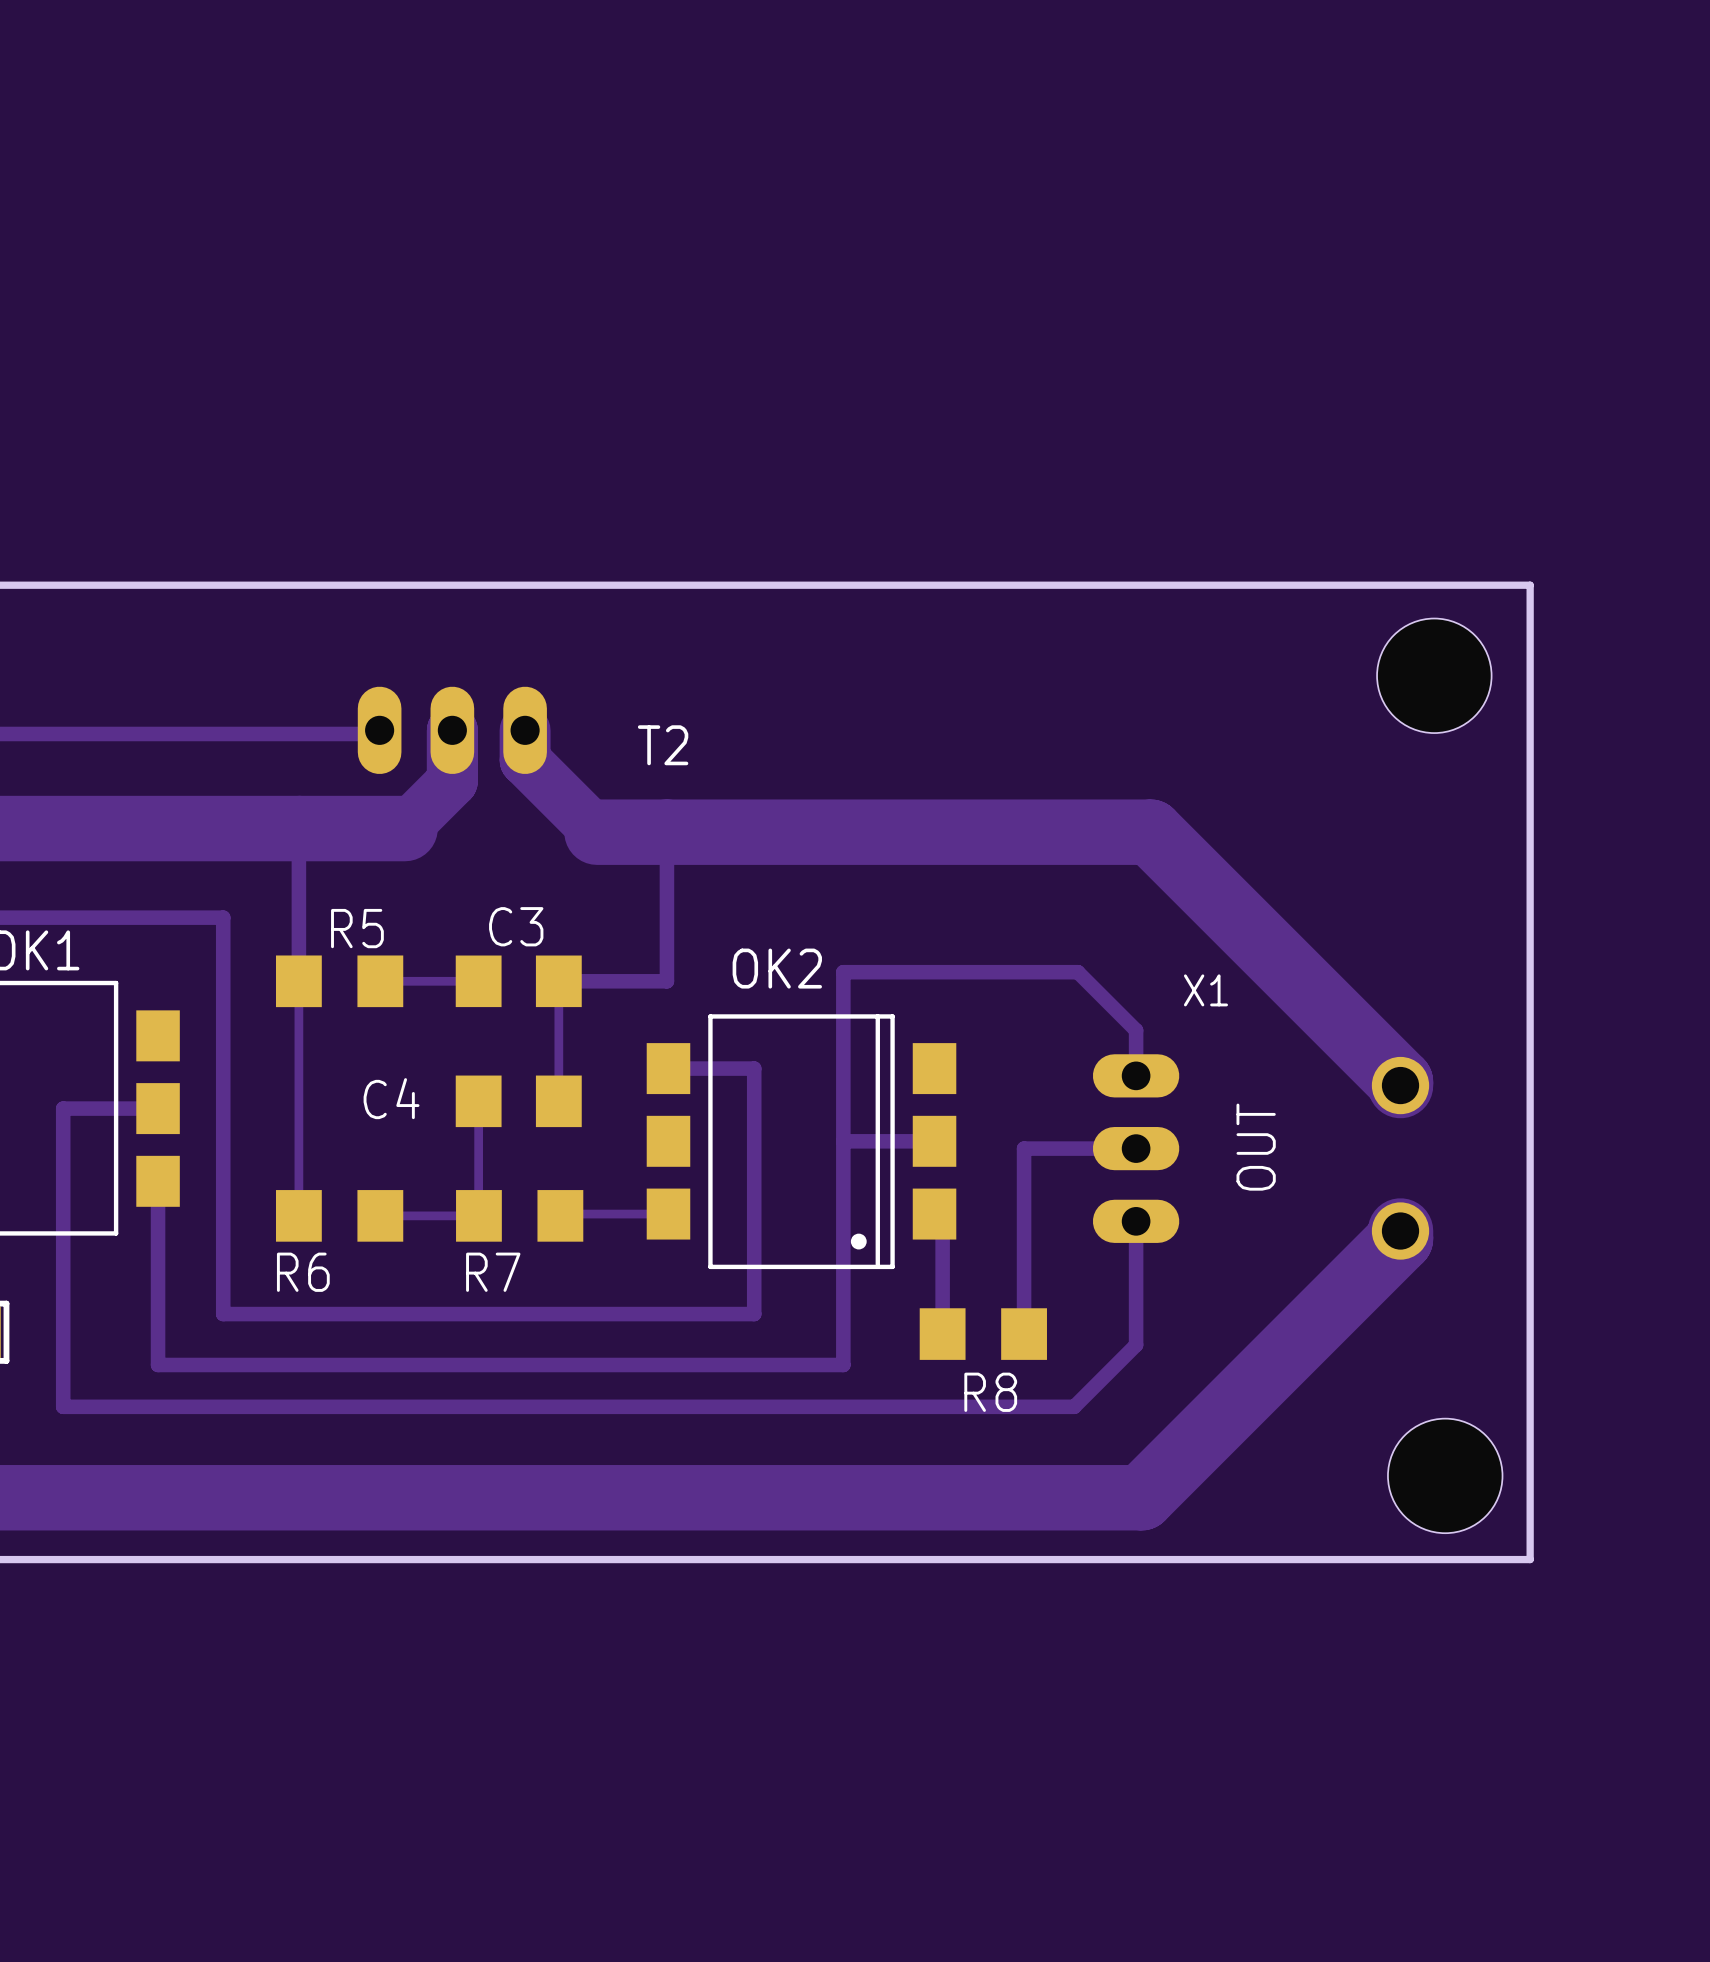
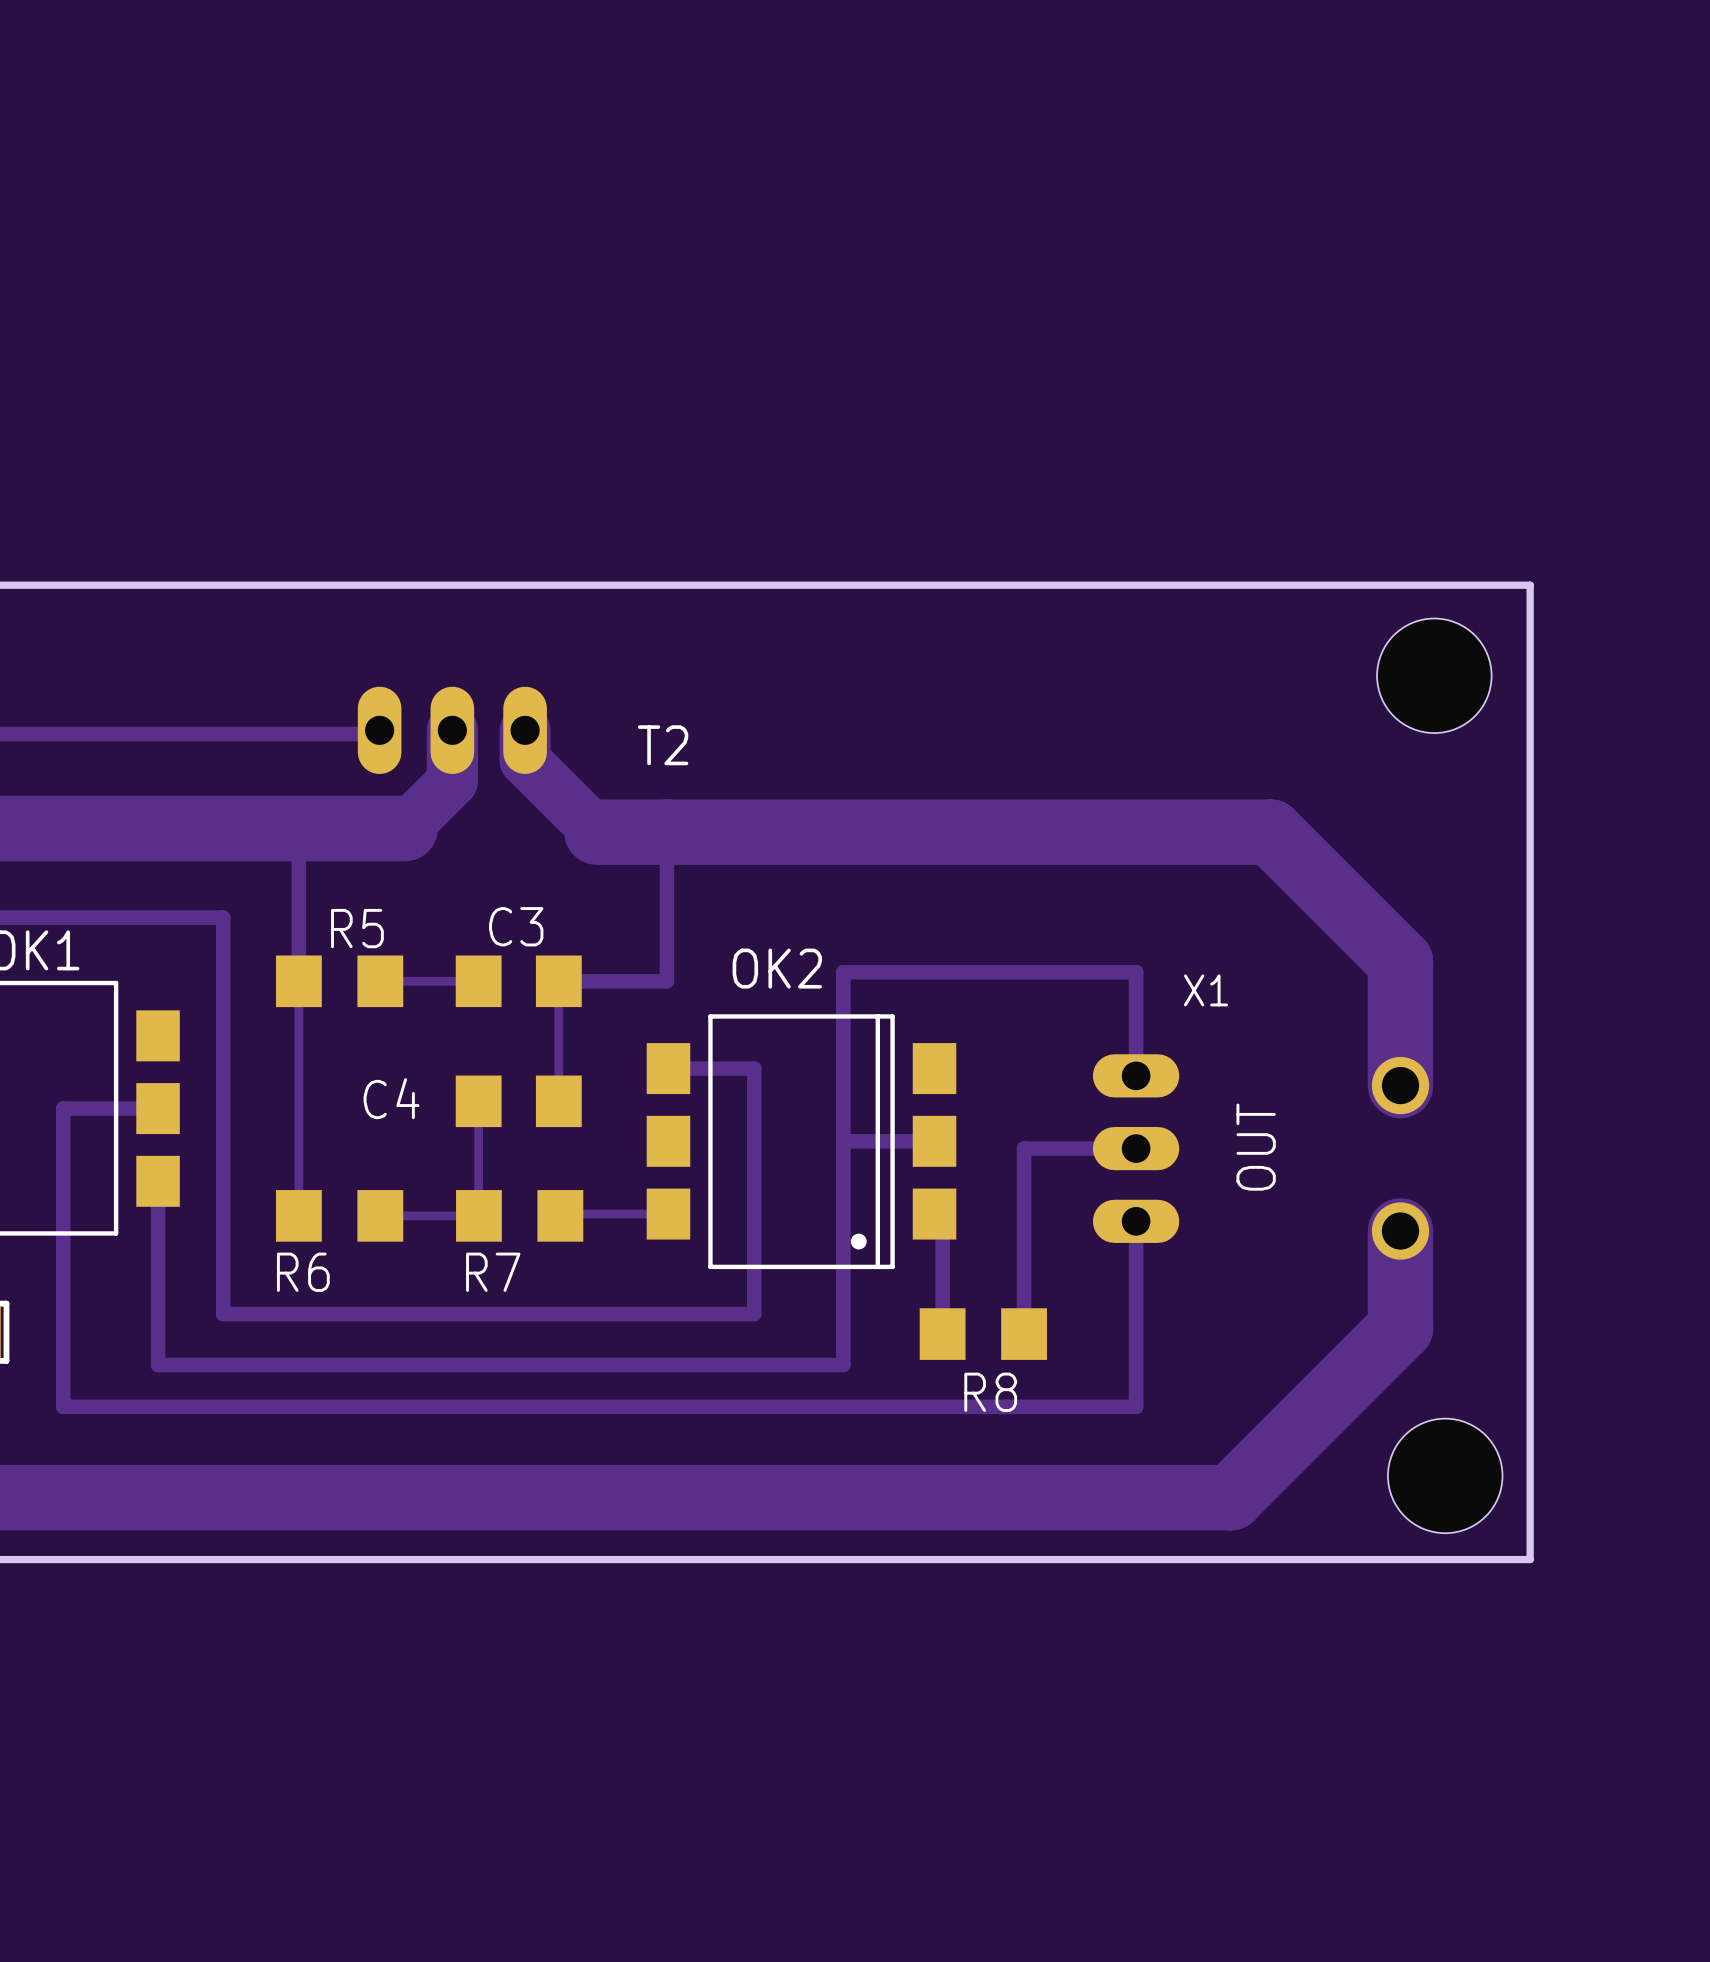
track: (1150, 832) (1400, 1082) (1400, 1085) -> (1150, 832) (1270, 832) (1400, 962) (1400, 1085)
track: (1077, 972) (1136, 1030) -> (1077, 972) (1136, 972) (1136, 1030)
track: (1400, 1238) (1141, 1497) -> (1400, 1238) (1400, 1327) (1230, 1497) (1141, 1497)
track: (1136, 1344) (1074, 1406) -> (1136, 1344) (1136, 1406) (1074, 1406)

